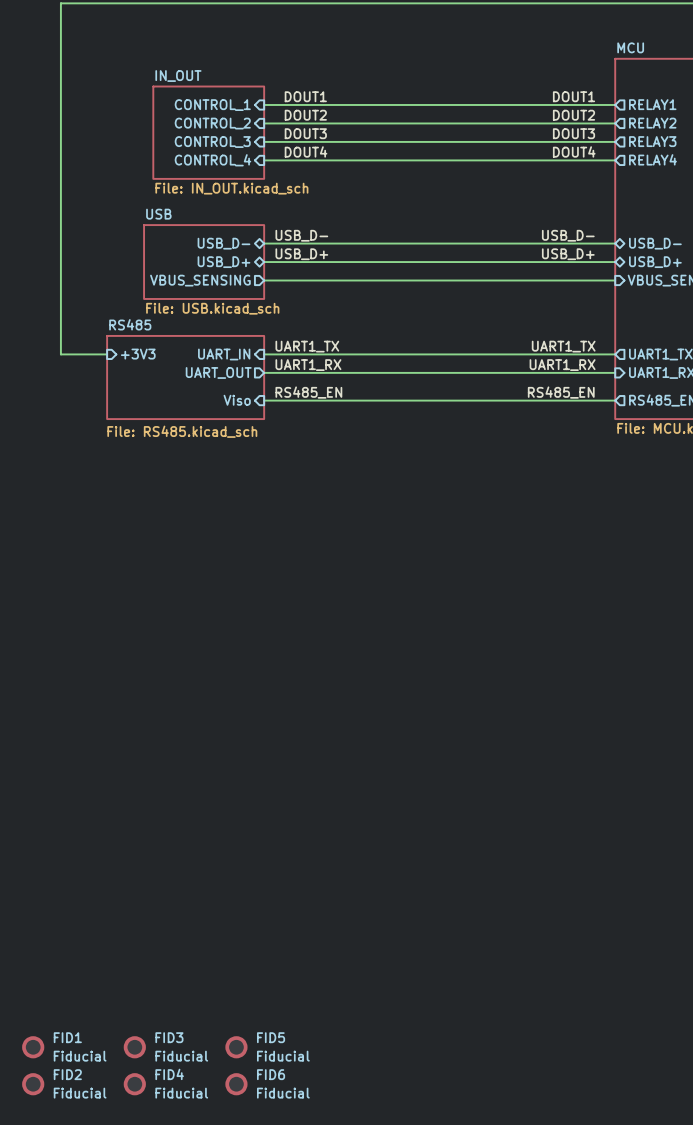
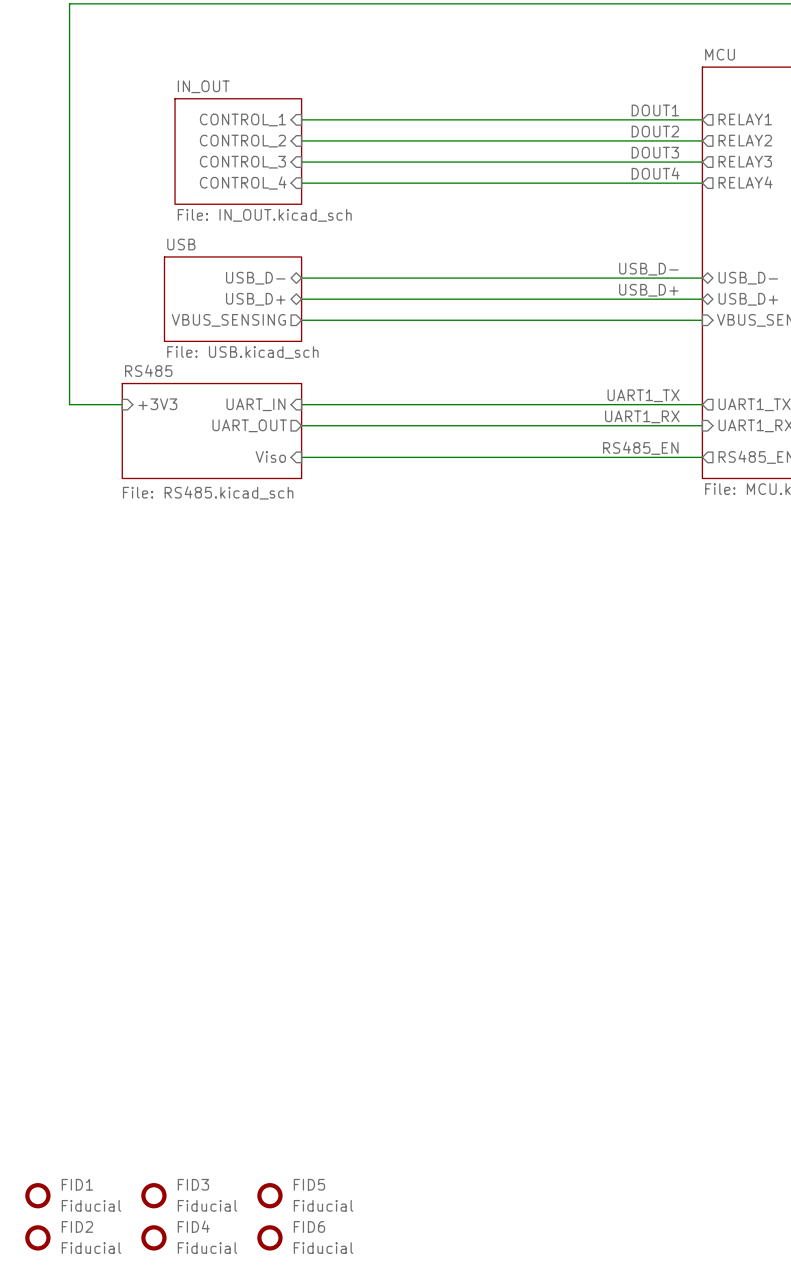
label: DOUT1 (305, 96) -> none
label: DOUT2 (305, 115) -> none
label: DOUT3 (305, 133) -> none
label: DOUT4 (306, 151) -> none
label: USB_D- (301, 235) -> none
label: USB_D+ (301, 254) -> none
label: UART1_TX (307, 346) -> none
label: UART1_RX (308, 365) -> none
label: RS485_EN (308, 392) -> none

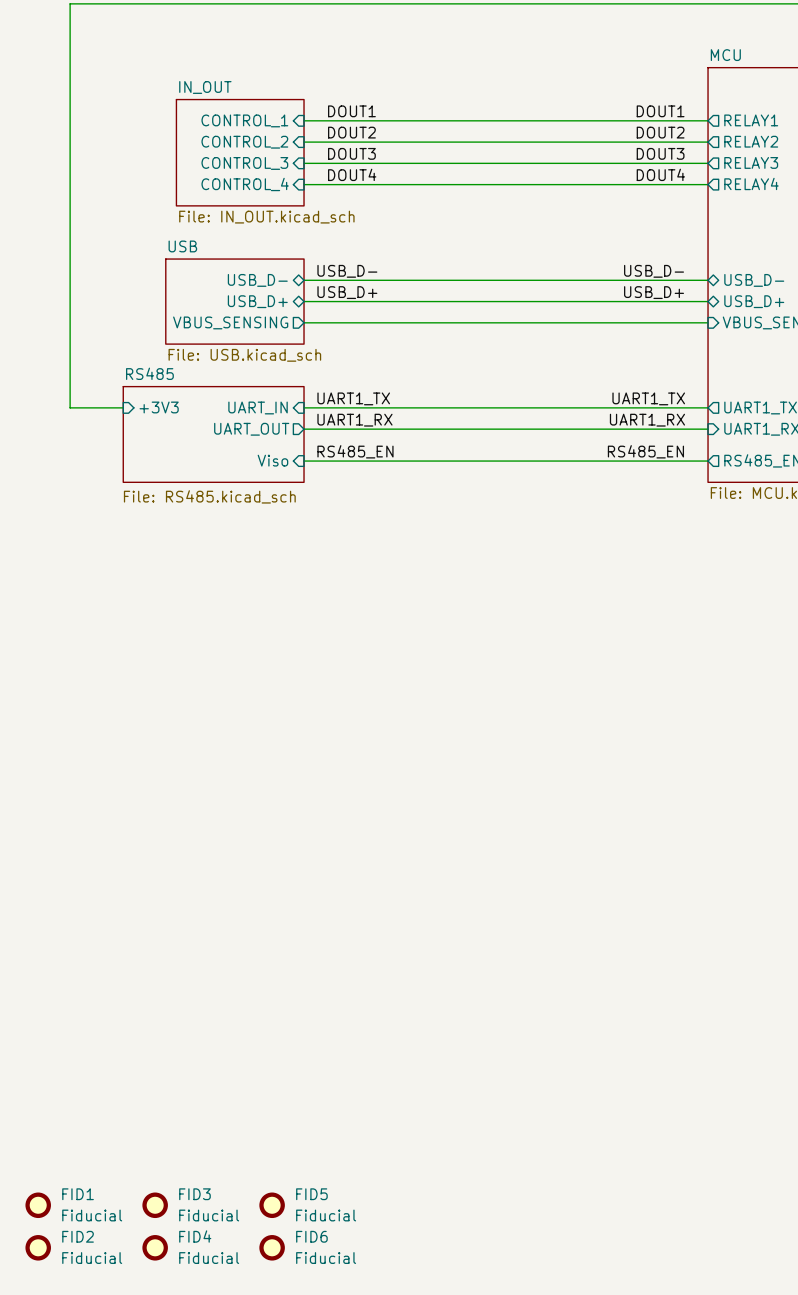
label: none -> DOUT1 (351, 111)
label: none -> DOUT2 (351, 132)
label: none -> DOUT3 (351, 153)
label: none -> DOUT4 (352, 174)
label: none -> USB_D- (347, 271)
label: none -> USB_D+ (347, 292)
label: none -> UART1_TX (353, 398)
label: none -> UART1_RX (354, 420)
label: none -> RS485_EN (355, 451)

